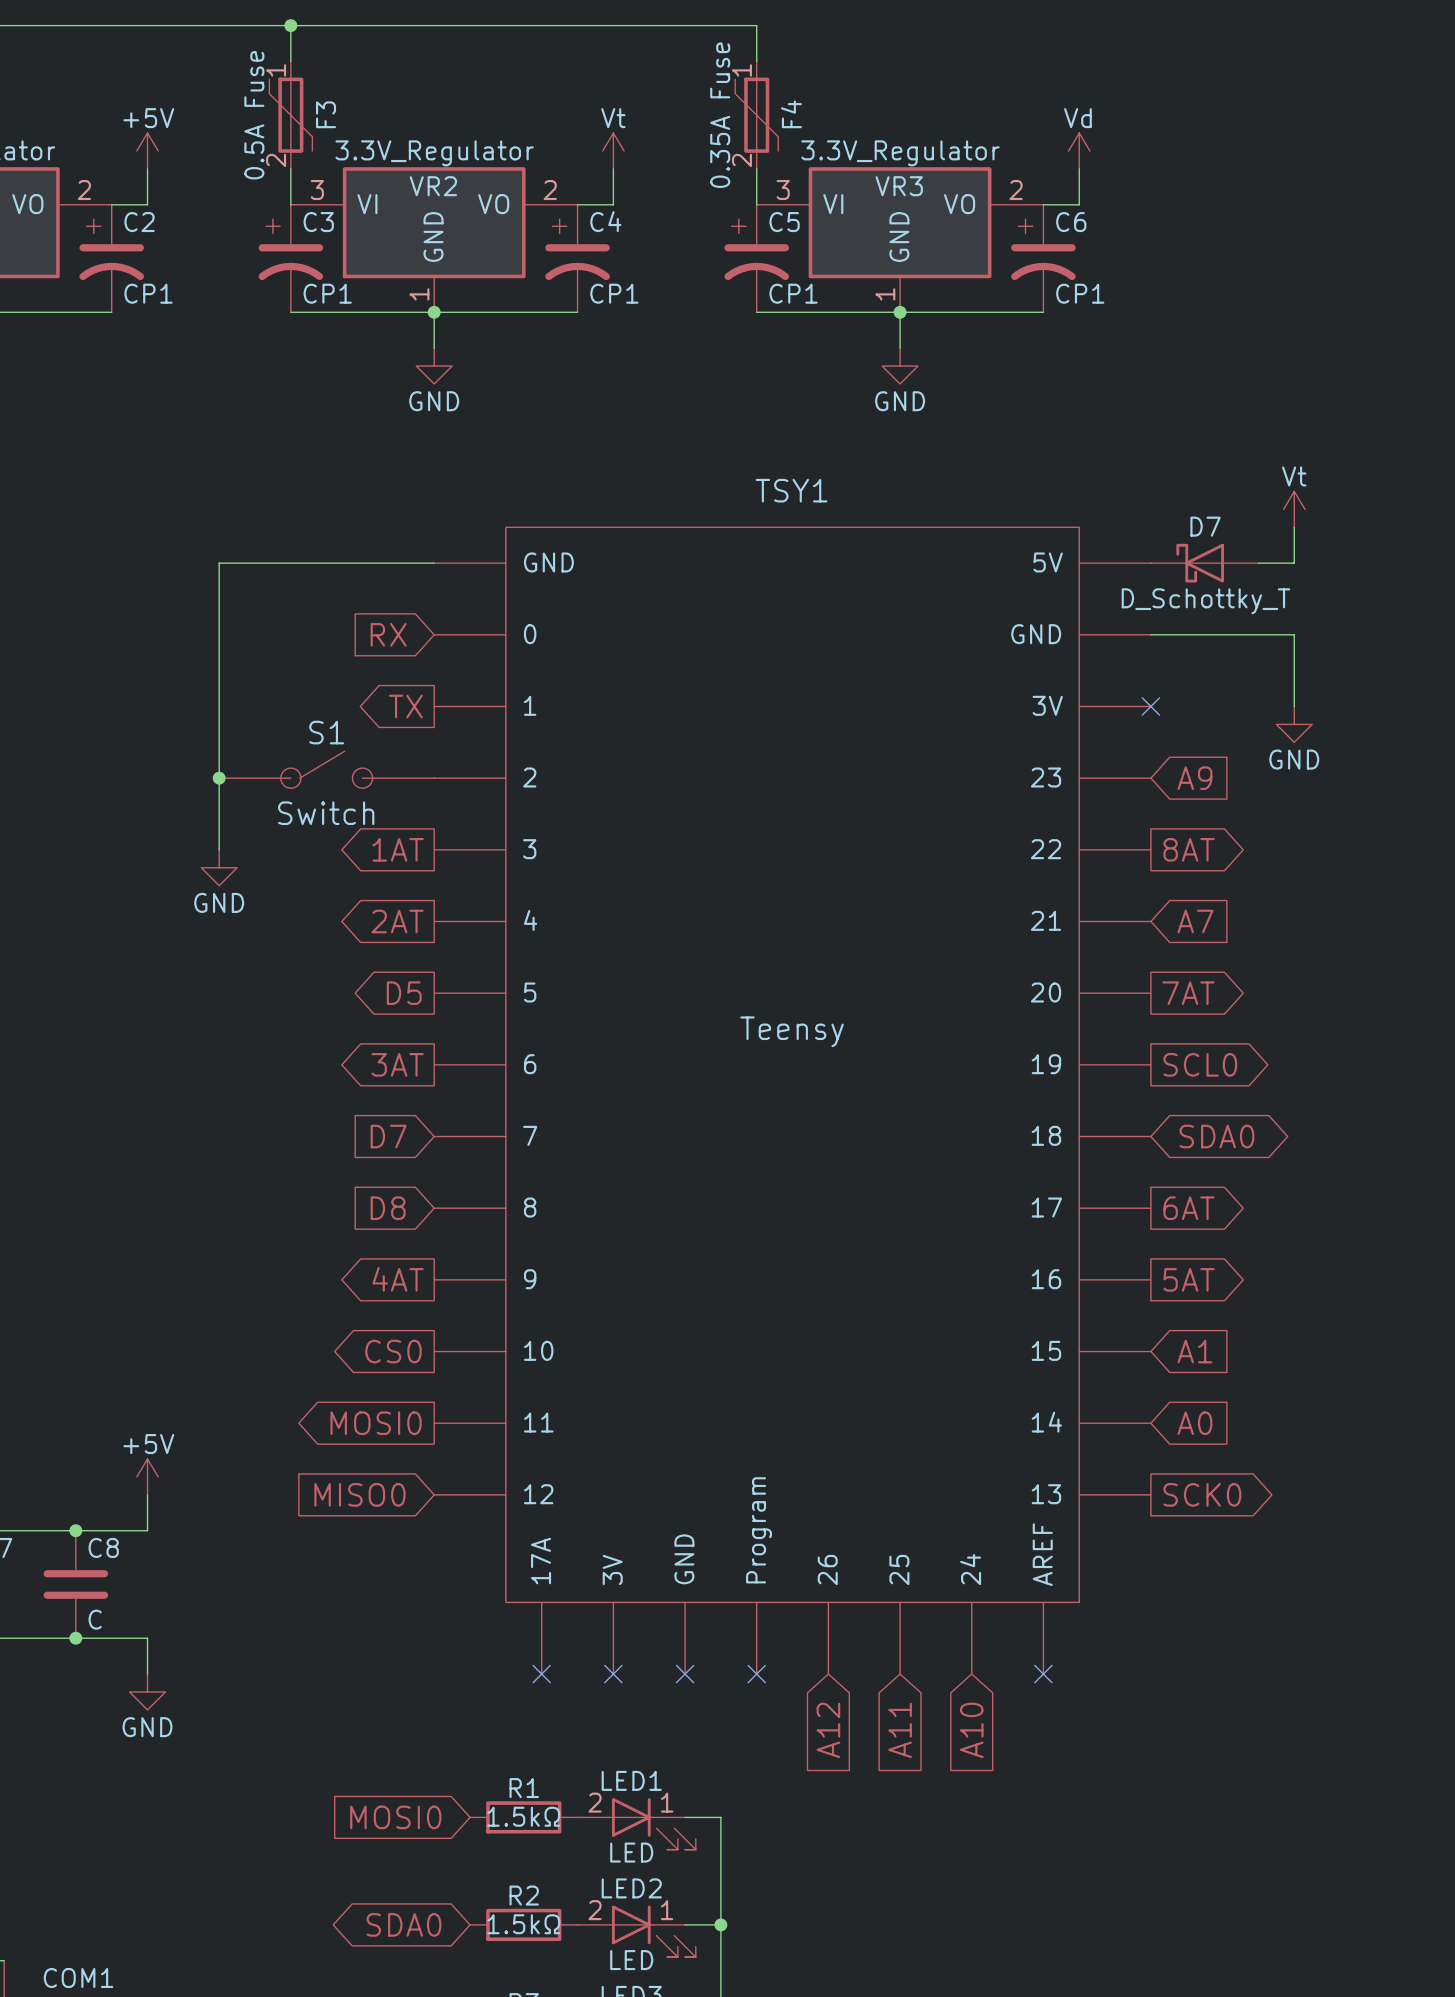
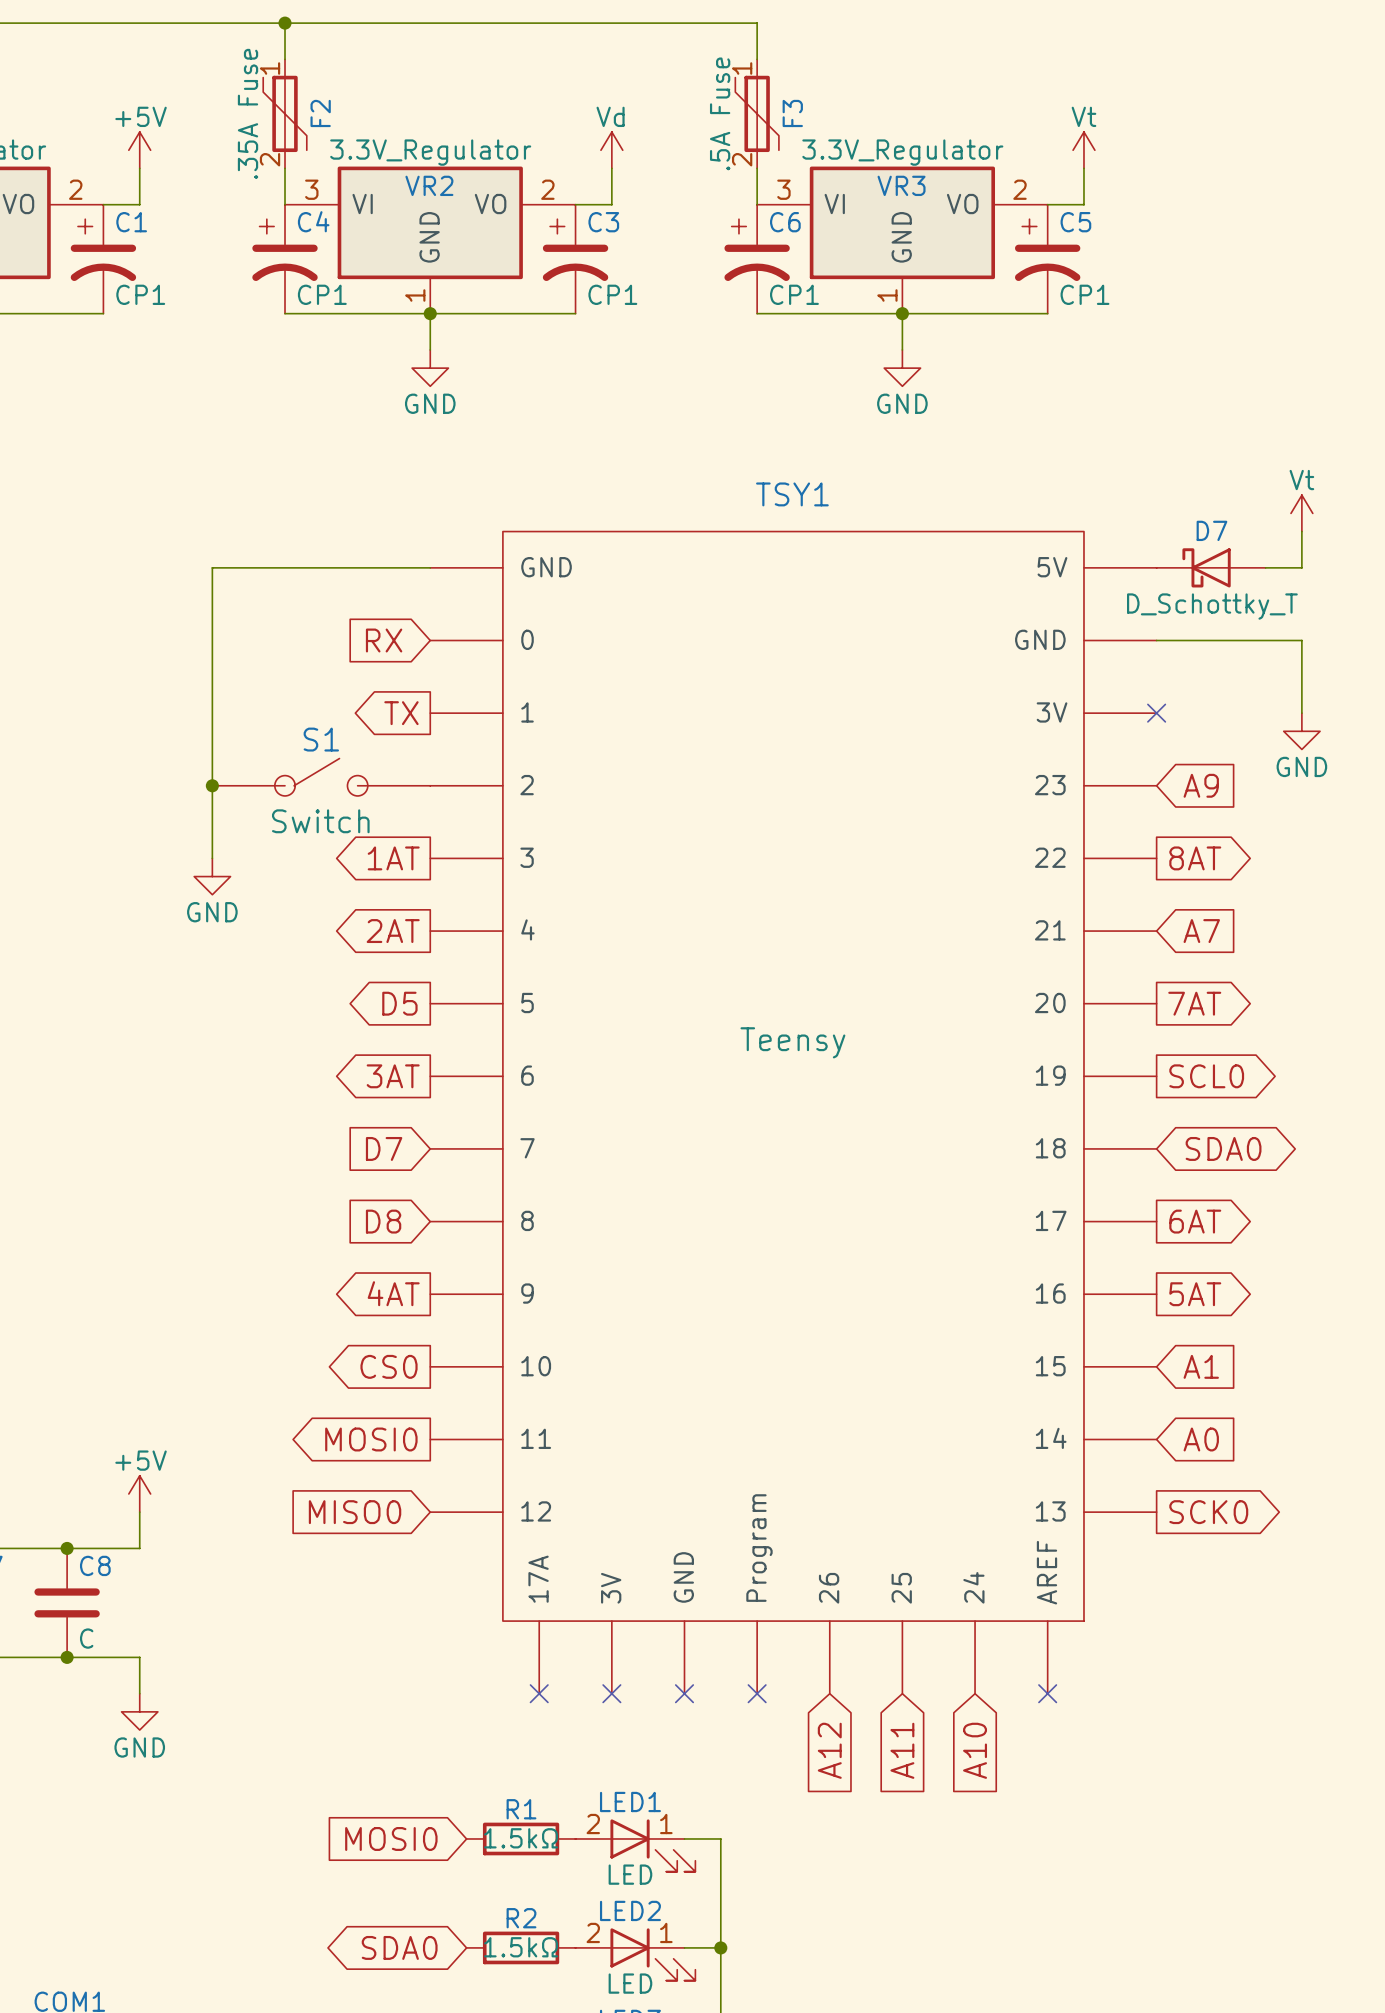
F3 name: F3 (326, 114) -> F2 (320, 113)
F4 name: F4 (791, 114) -> F3 (792, 113)
F3 value: 0.5A Fuse (254, 115) -> .35A Fuse (248, 113)
F4 value: 0.35A Fuse (720, 115) -> .5A Fuse (720, 113)
power symbol: Vt (613, 151) -> Vd (611, 150)
power symbol: Vd (1079, 151) -> Vt (1083, 150)
C4 name: C4 (605, 221) -> C3 (603, 222)
C2 name: C2 (139, 222) -> C1 (131, 222)
C3 name: C3 (318, 222) -> C4 (313, 221)
C5 name: C5 (784, 222) -> C6 (785, 222)
C6 name: C6 (1071, 222) -> C5 (1075, 222)

